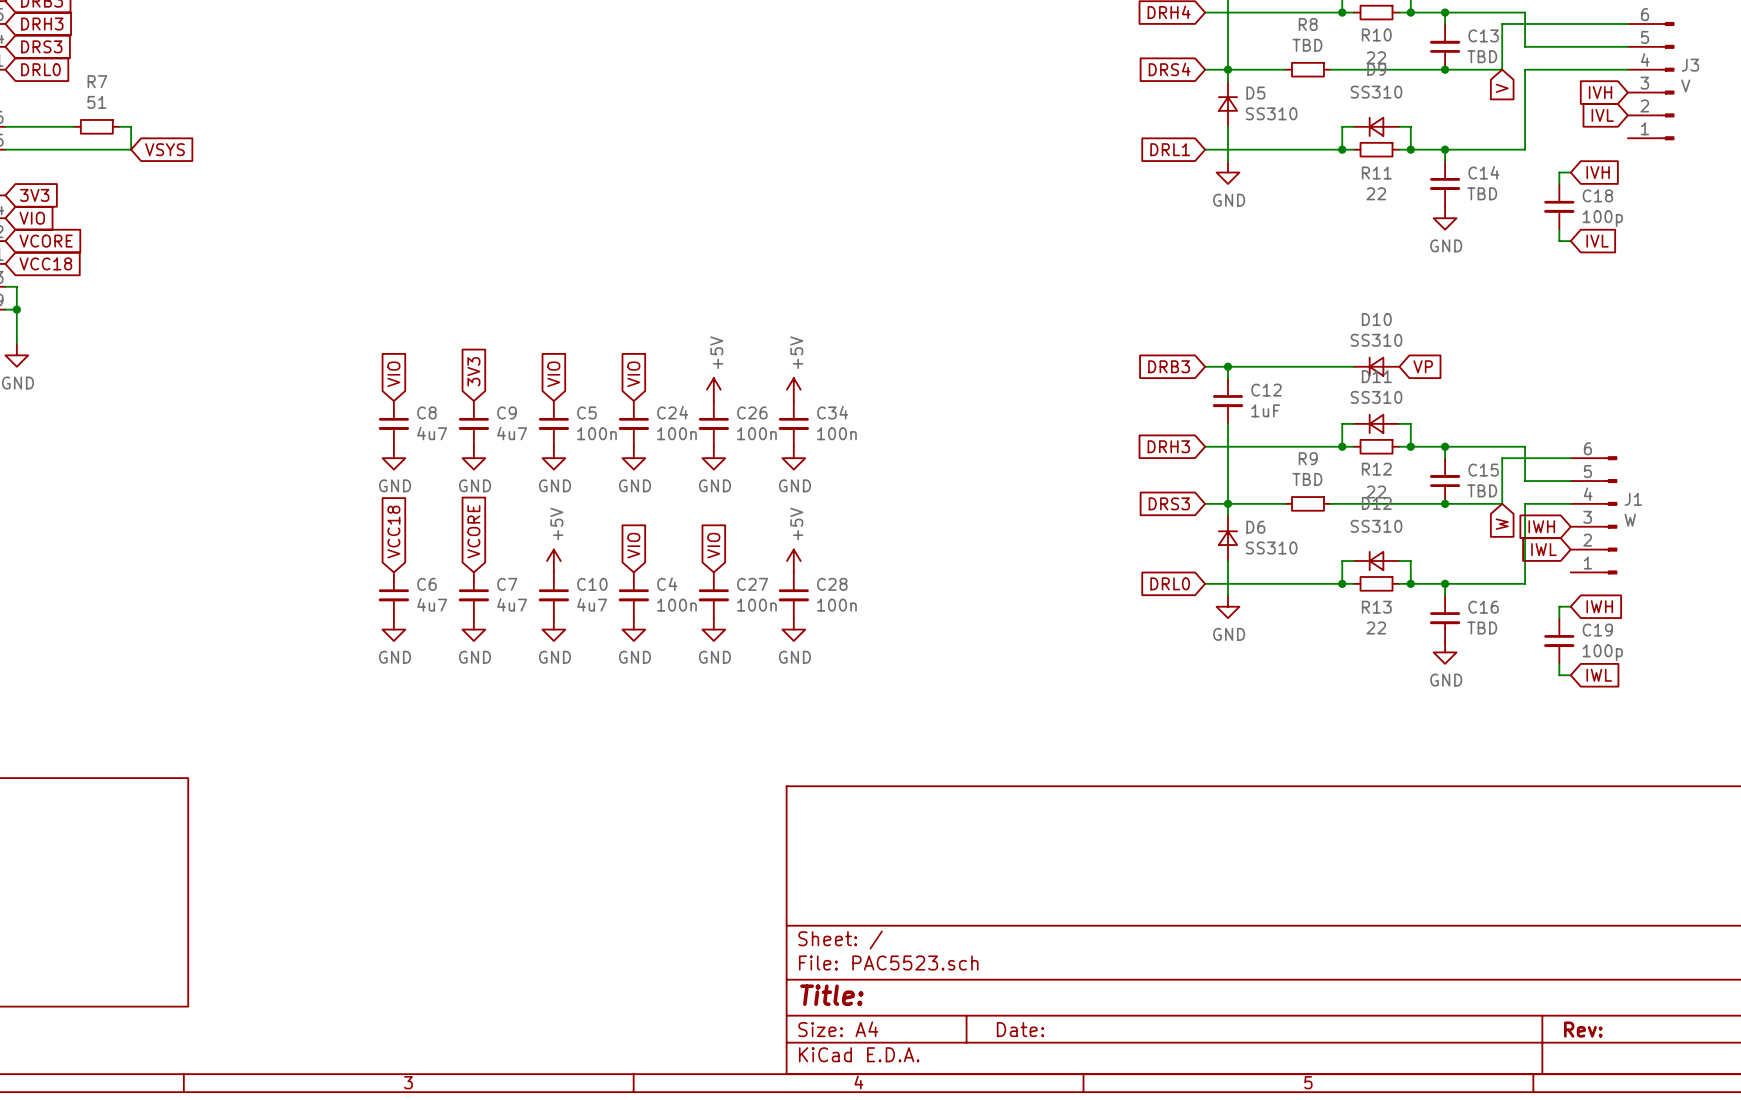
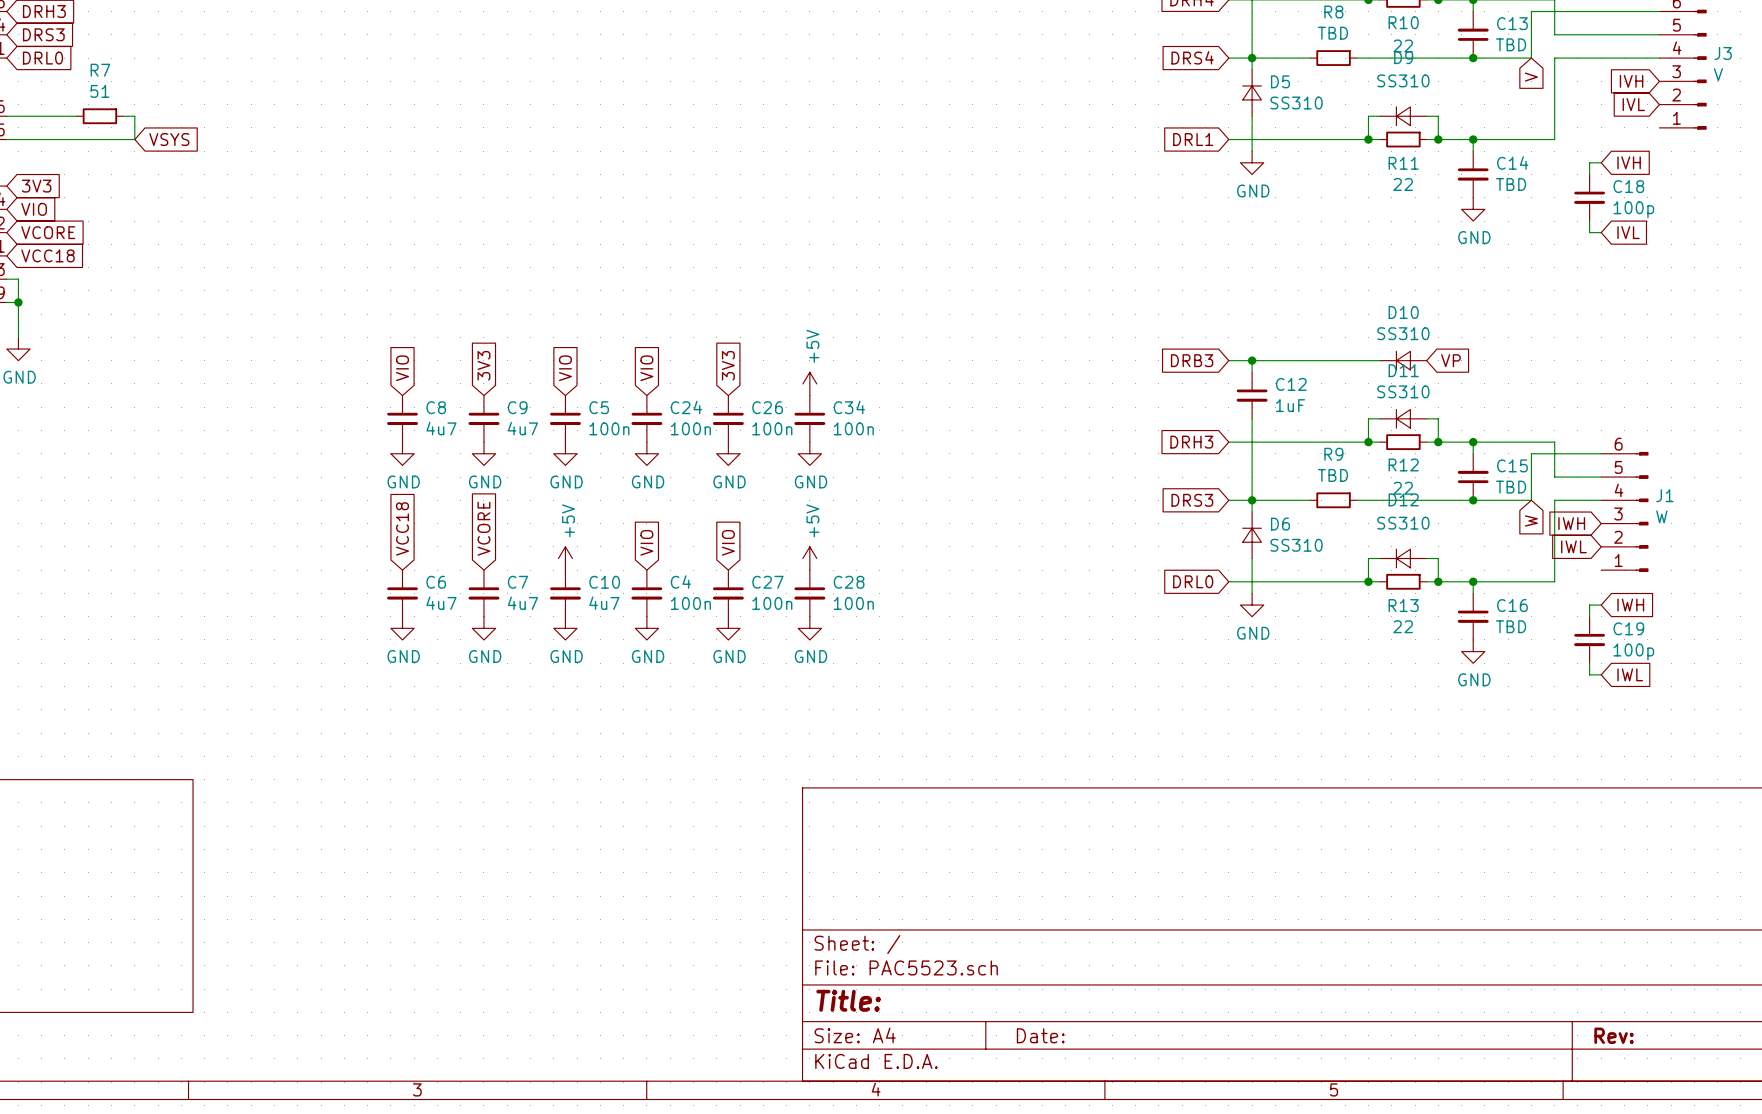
global label: none -> 3V3 (728, 365)
power symbol: +5V (713, 389) -> none

